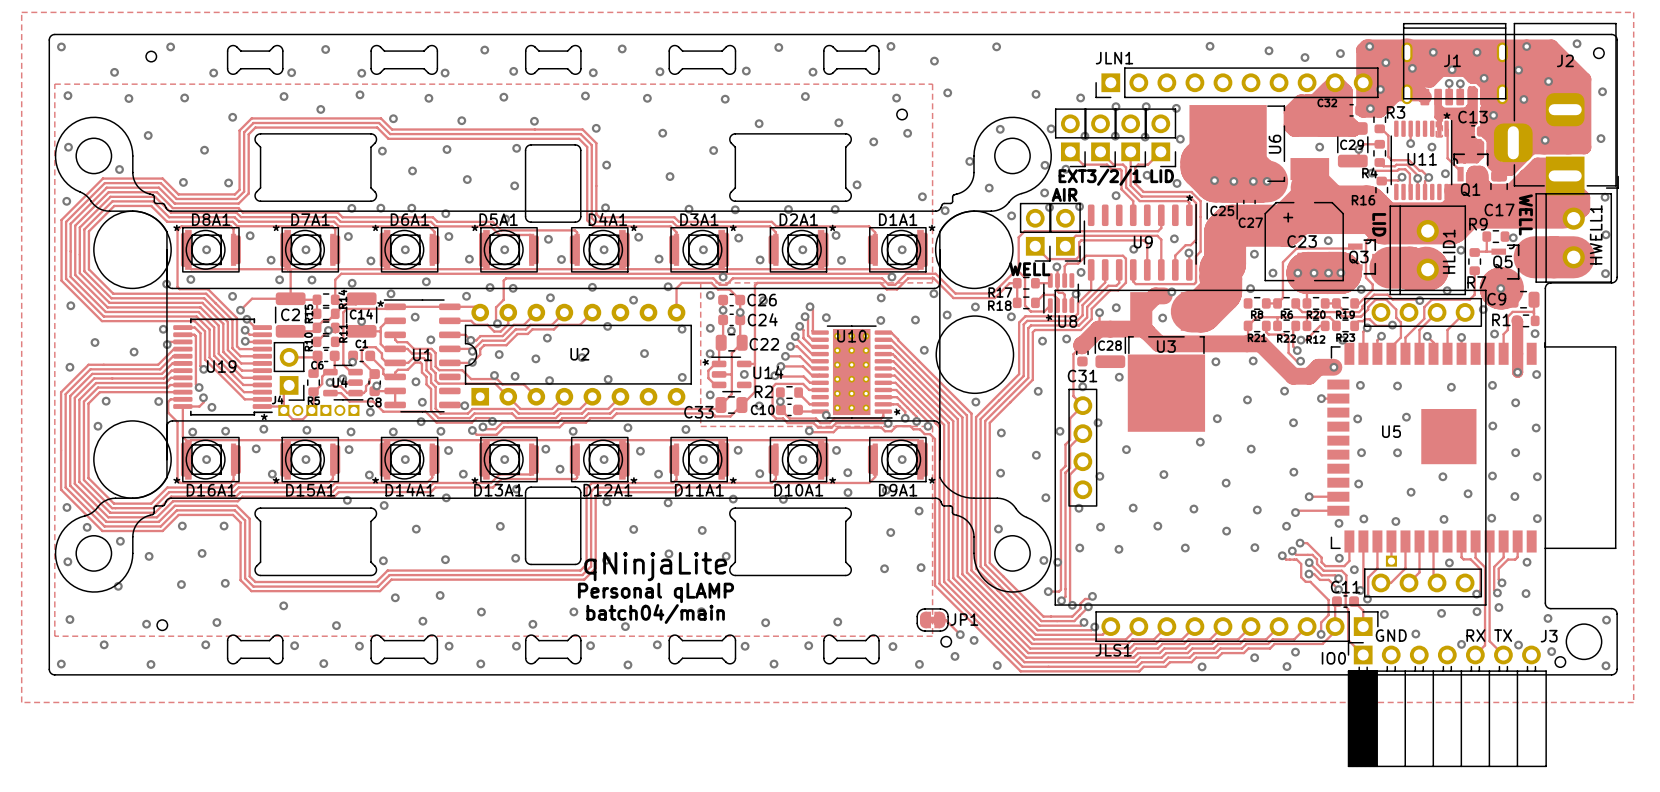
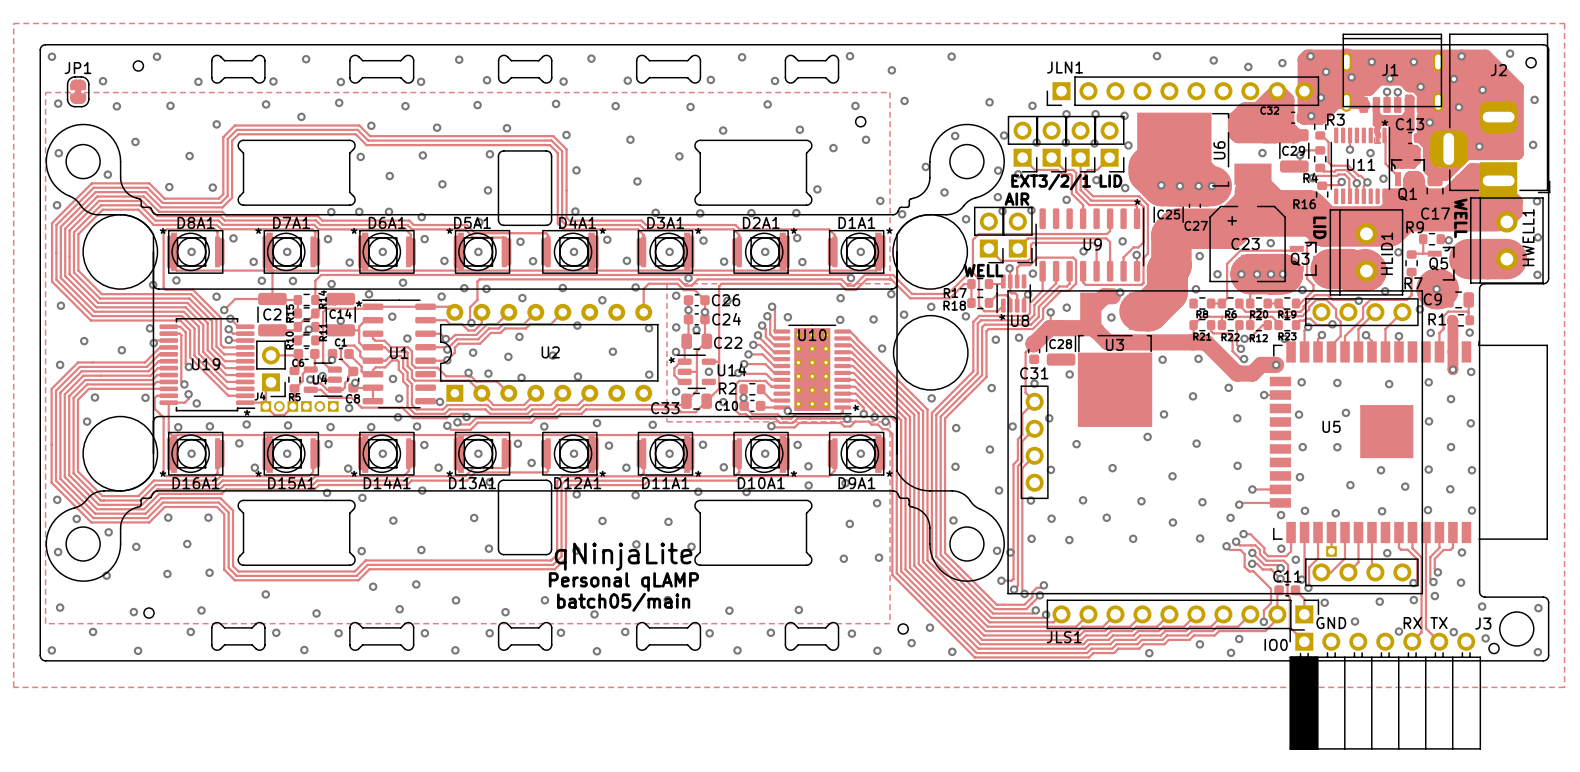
text: batch04/main (655, 614) -> batch05/main (623, 602)
JP1 rotation: 0° (932, 619) -> 90° clockwise (78, 91)
JP1 position: (932, 619) -> (78, 91)
track: (939, 619) (945, 619) (960, 634) -> none
JP1 name position: JP1 (964, 619) -> JP1 (78, 68)
via: (960, 634) -> none

